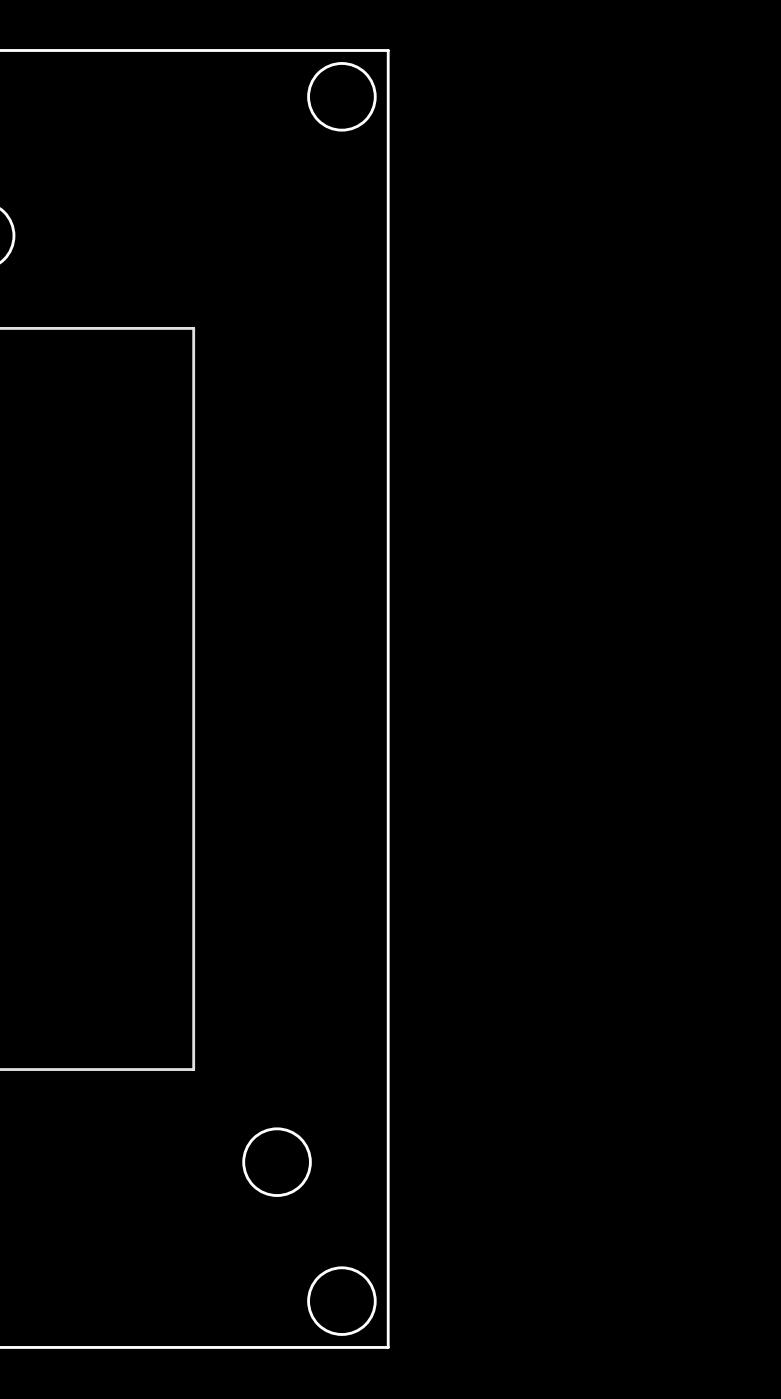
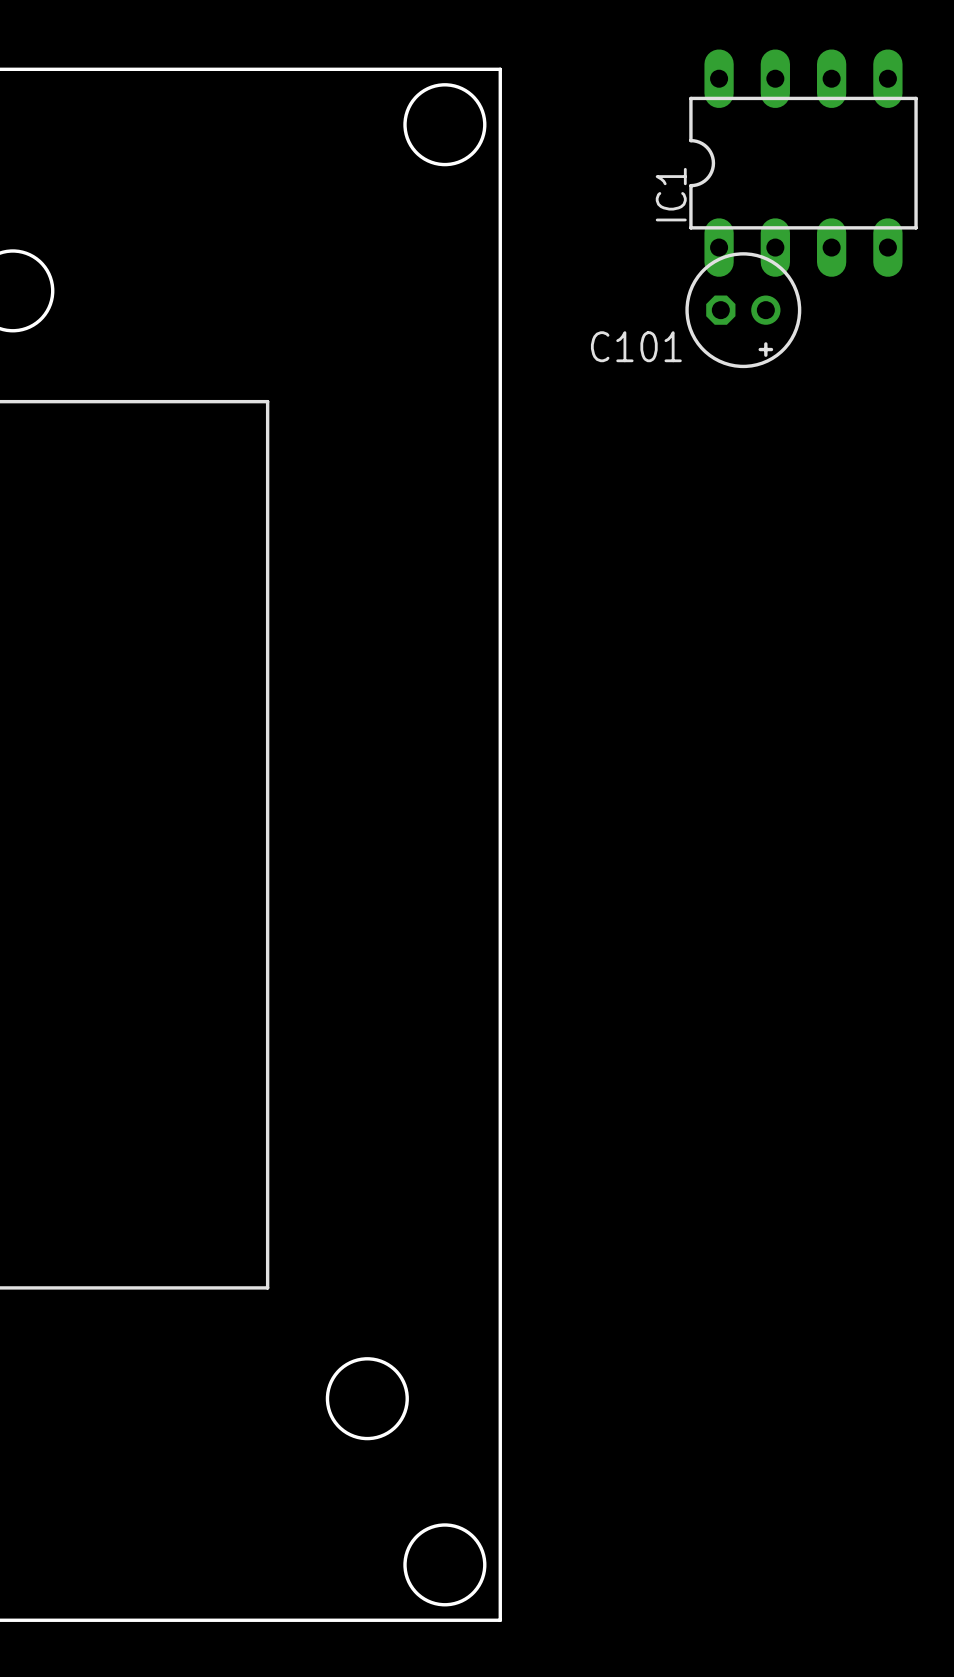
IC1: none -> (803, 163)
C101: none -> (743, 310)

